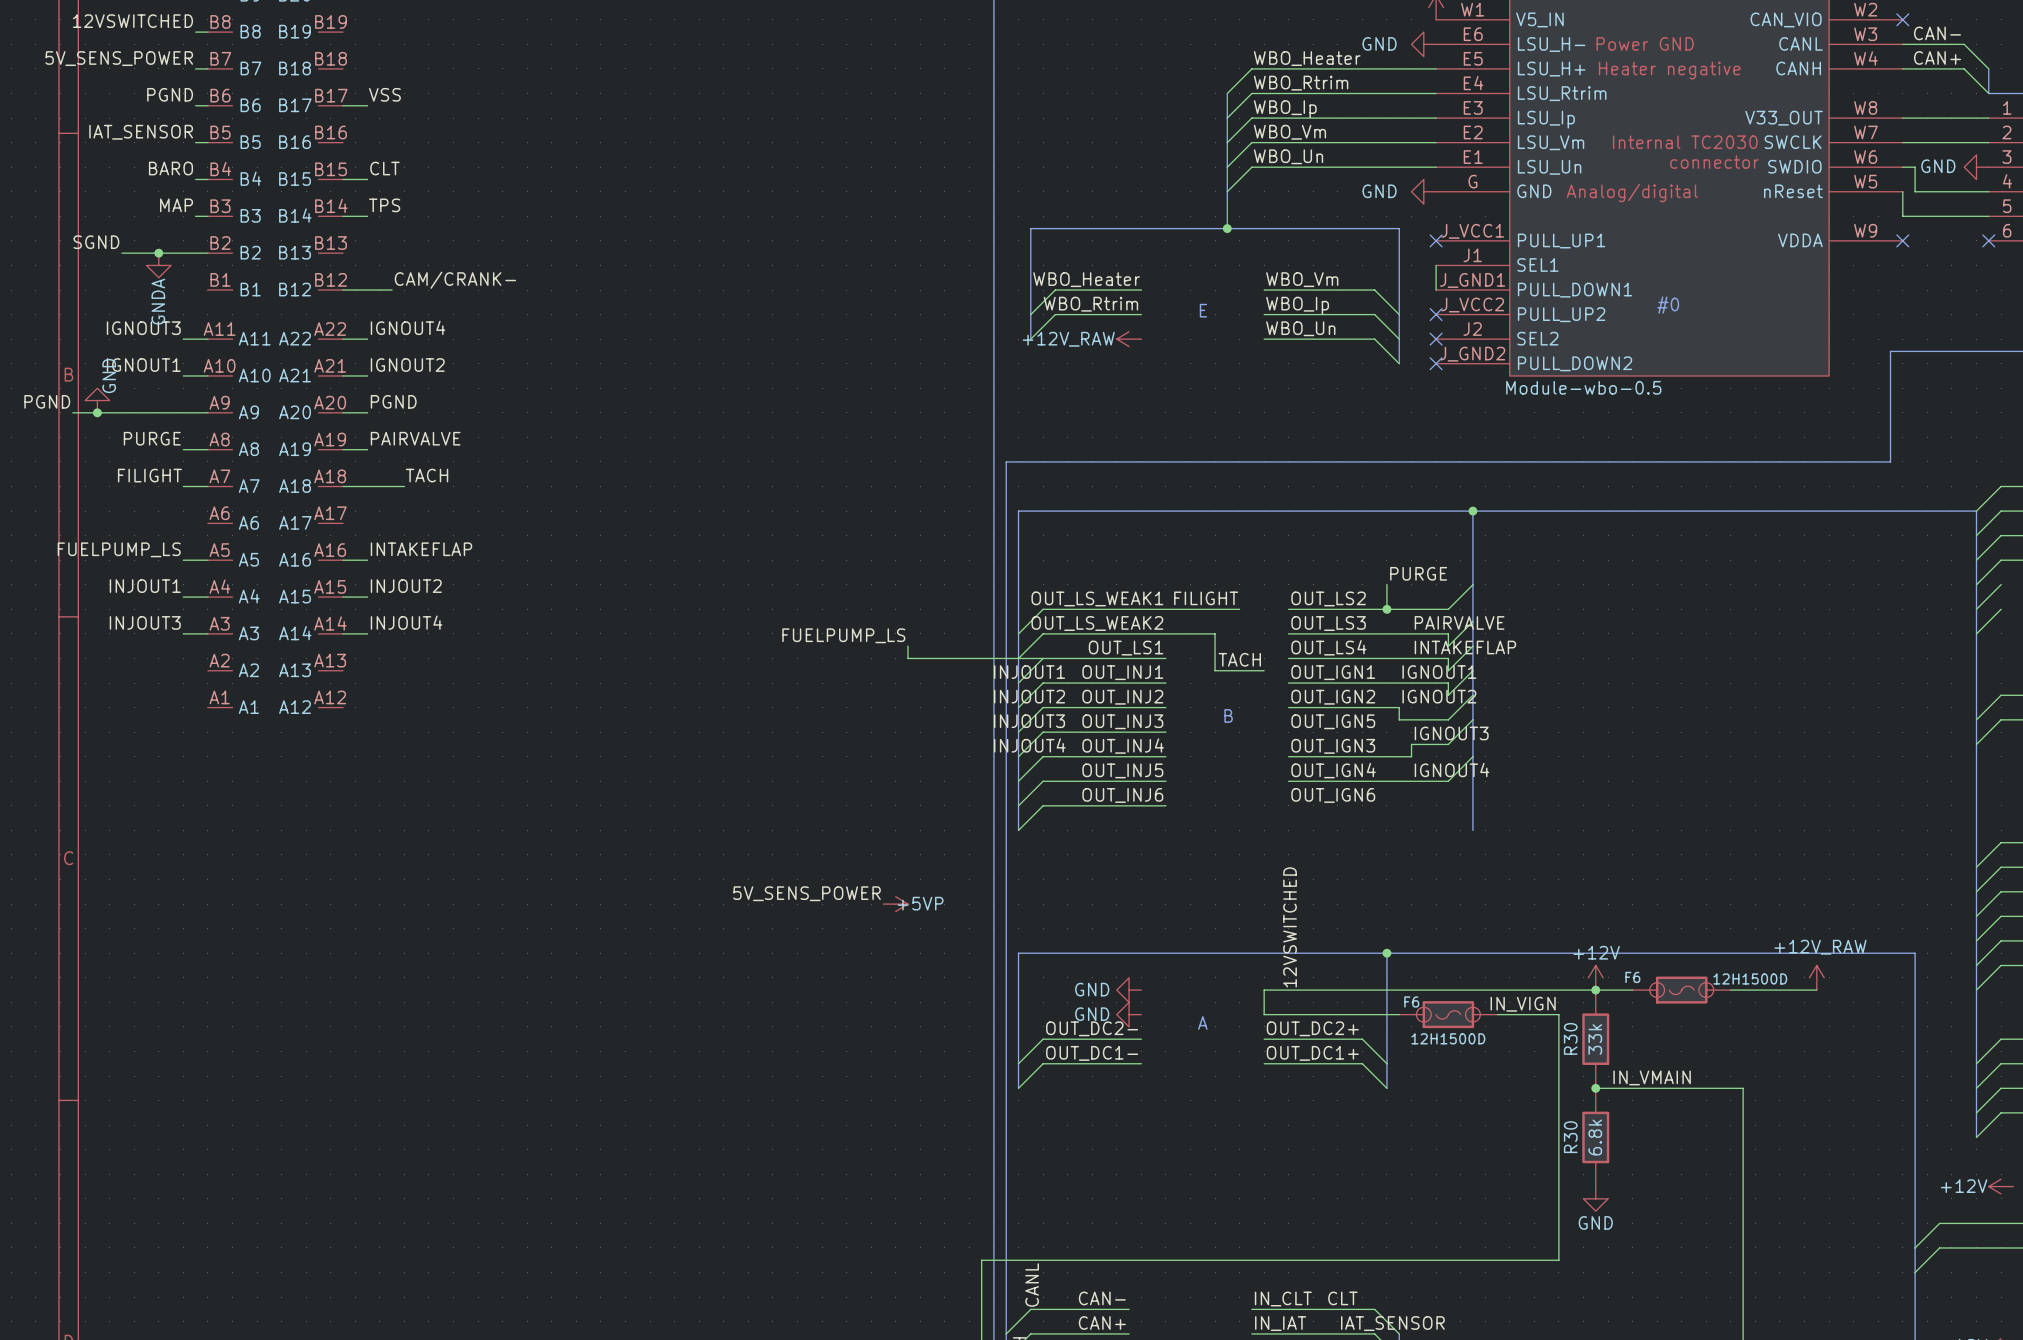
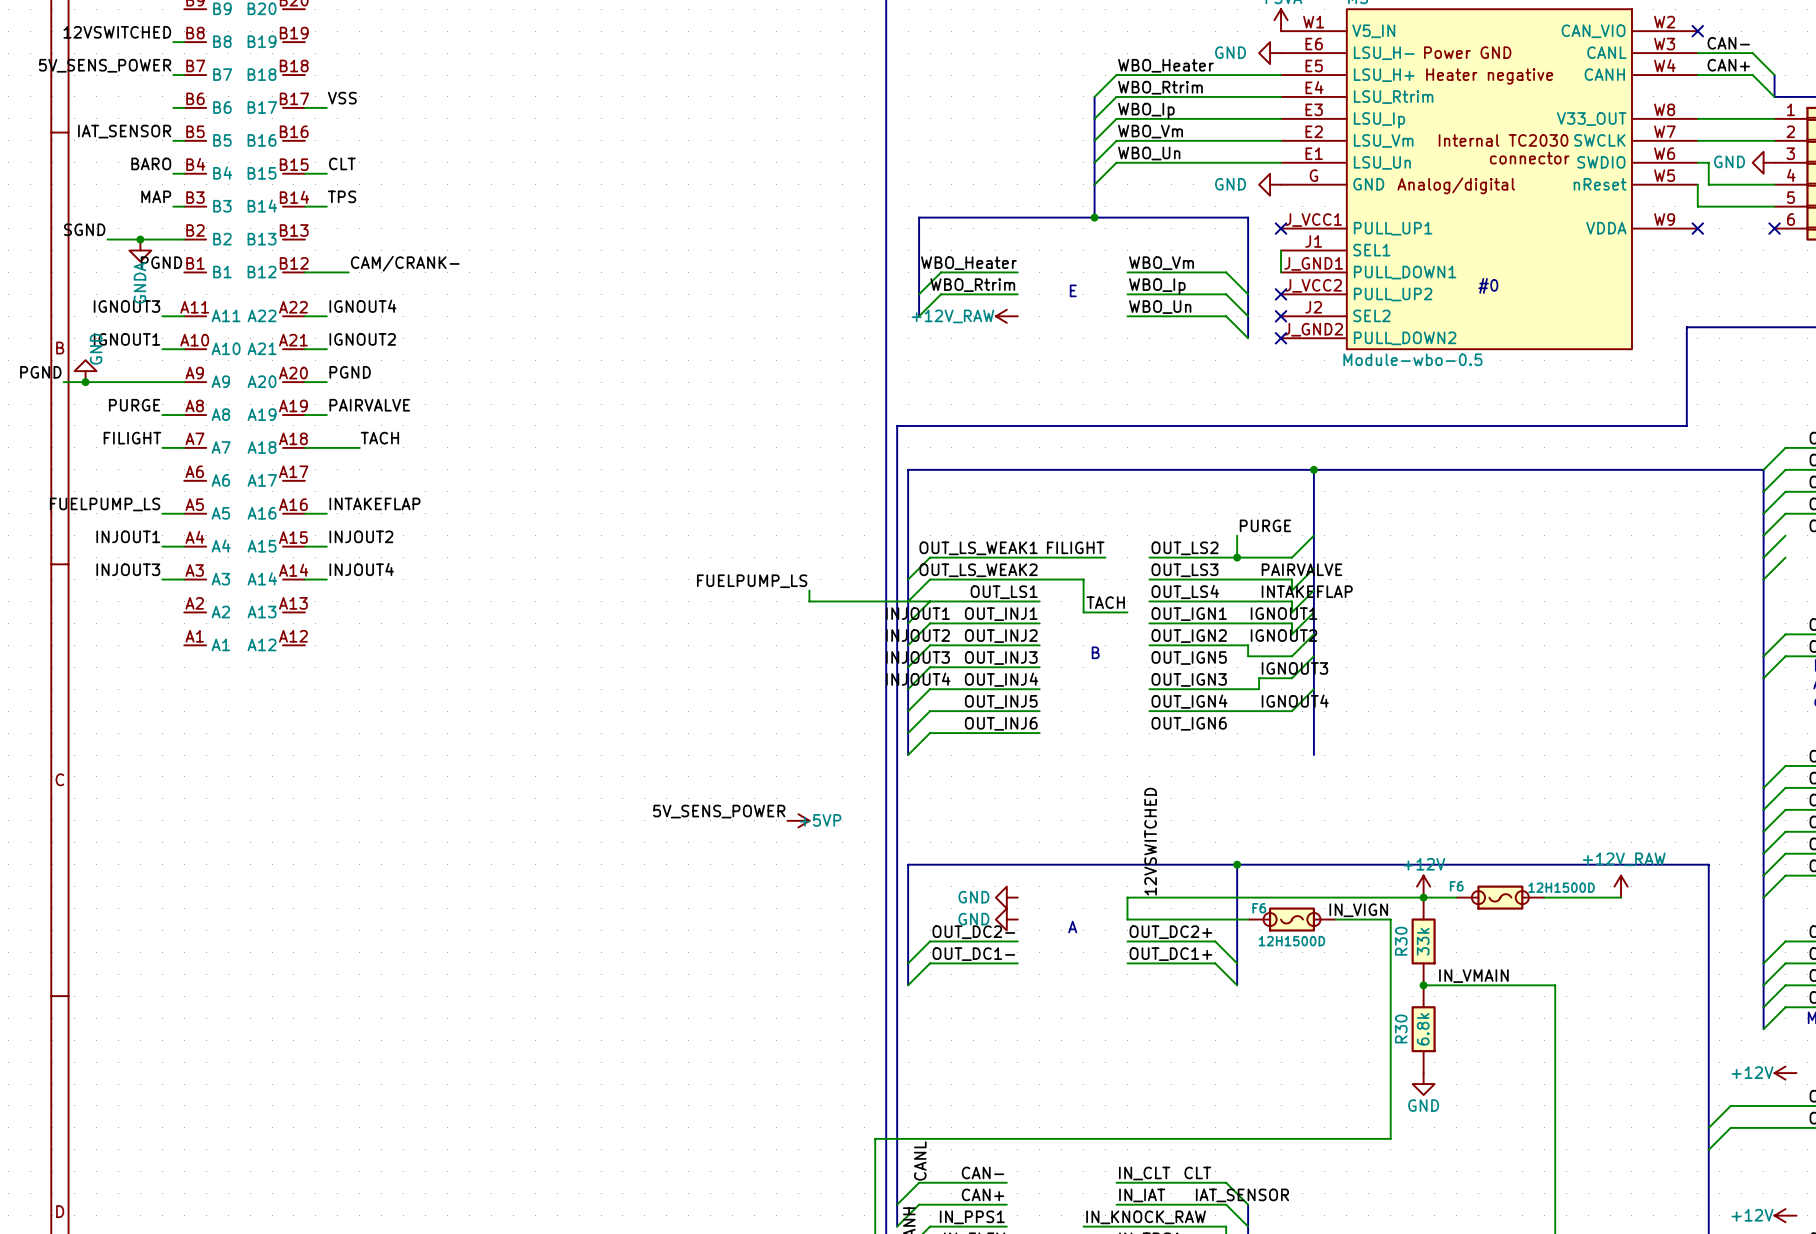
label position: PGND (170, 94) -> PGND (161, 262)

